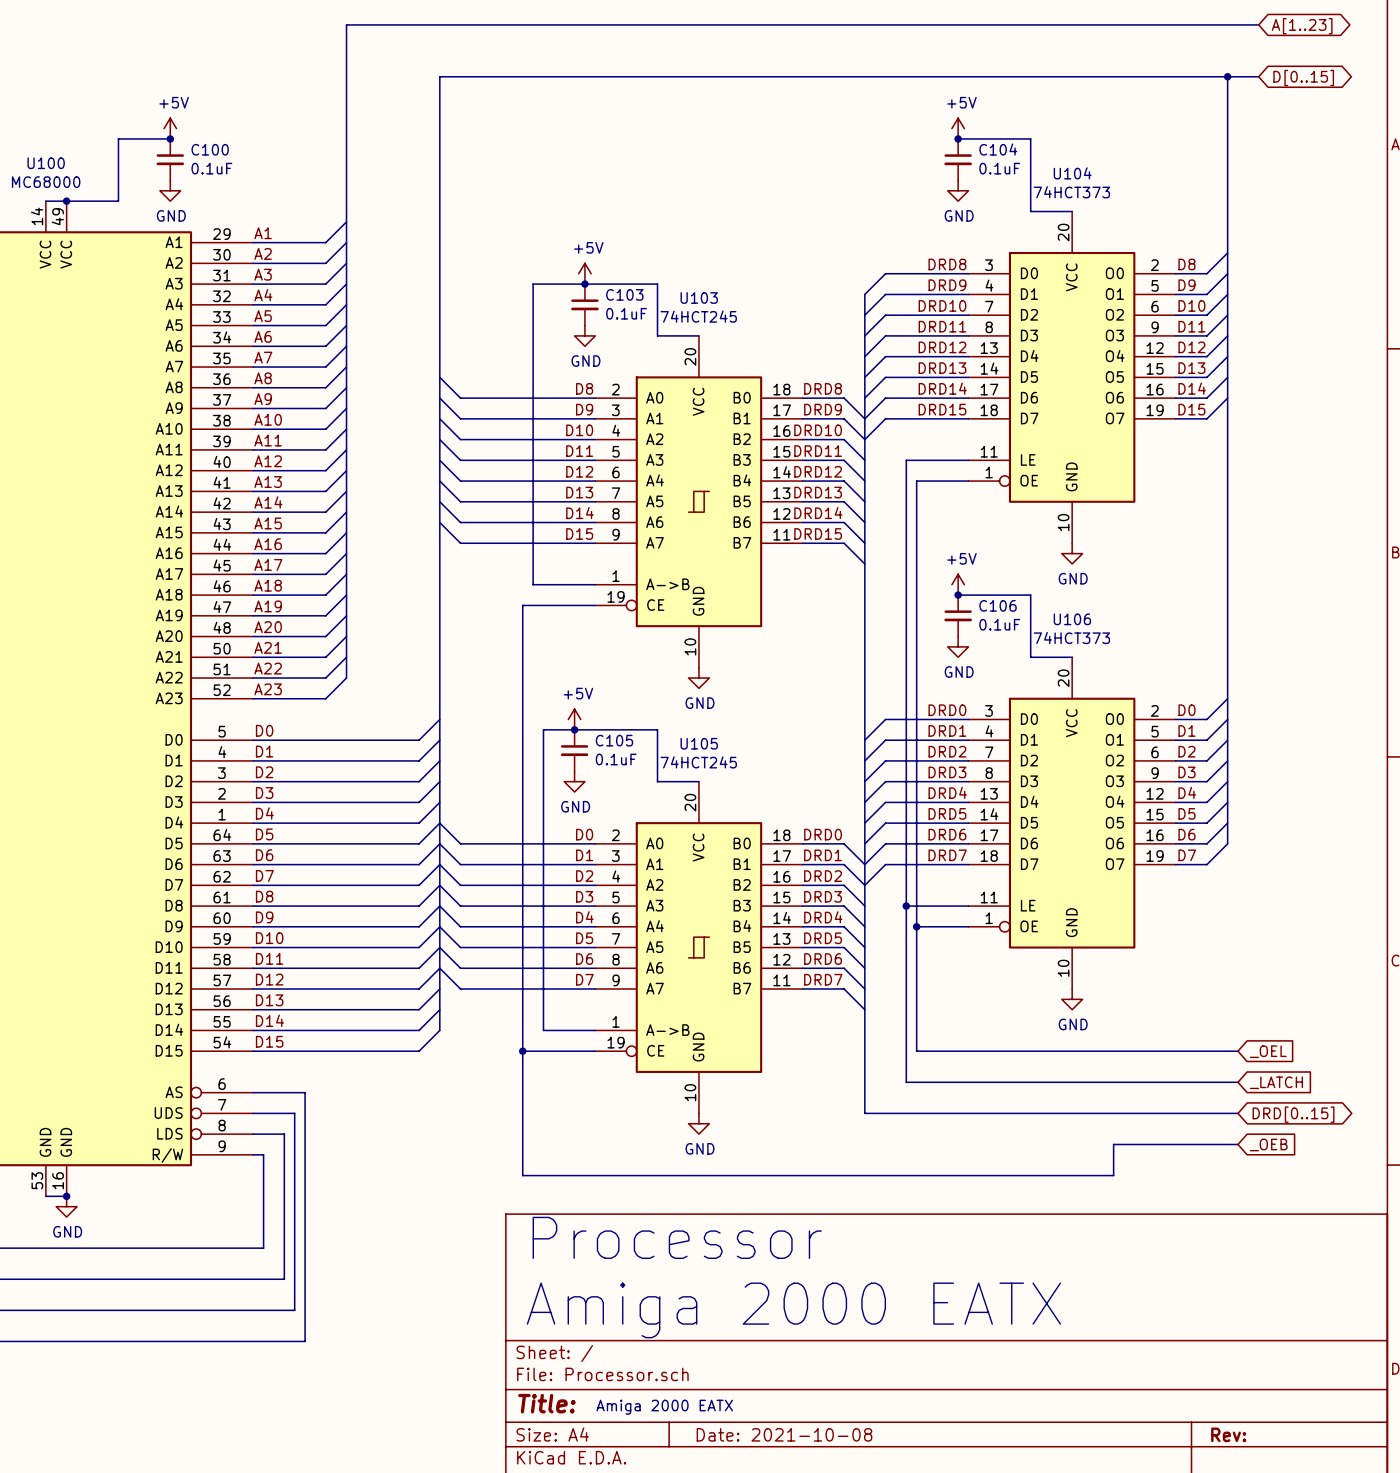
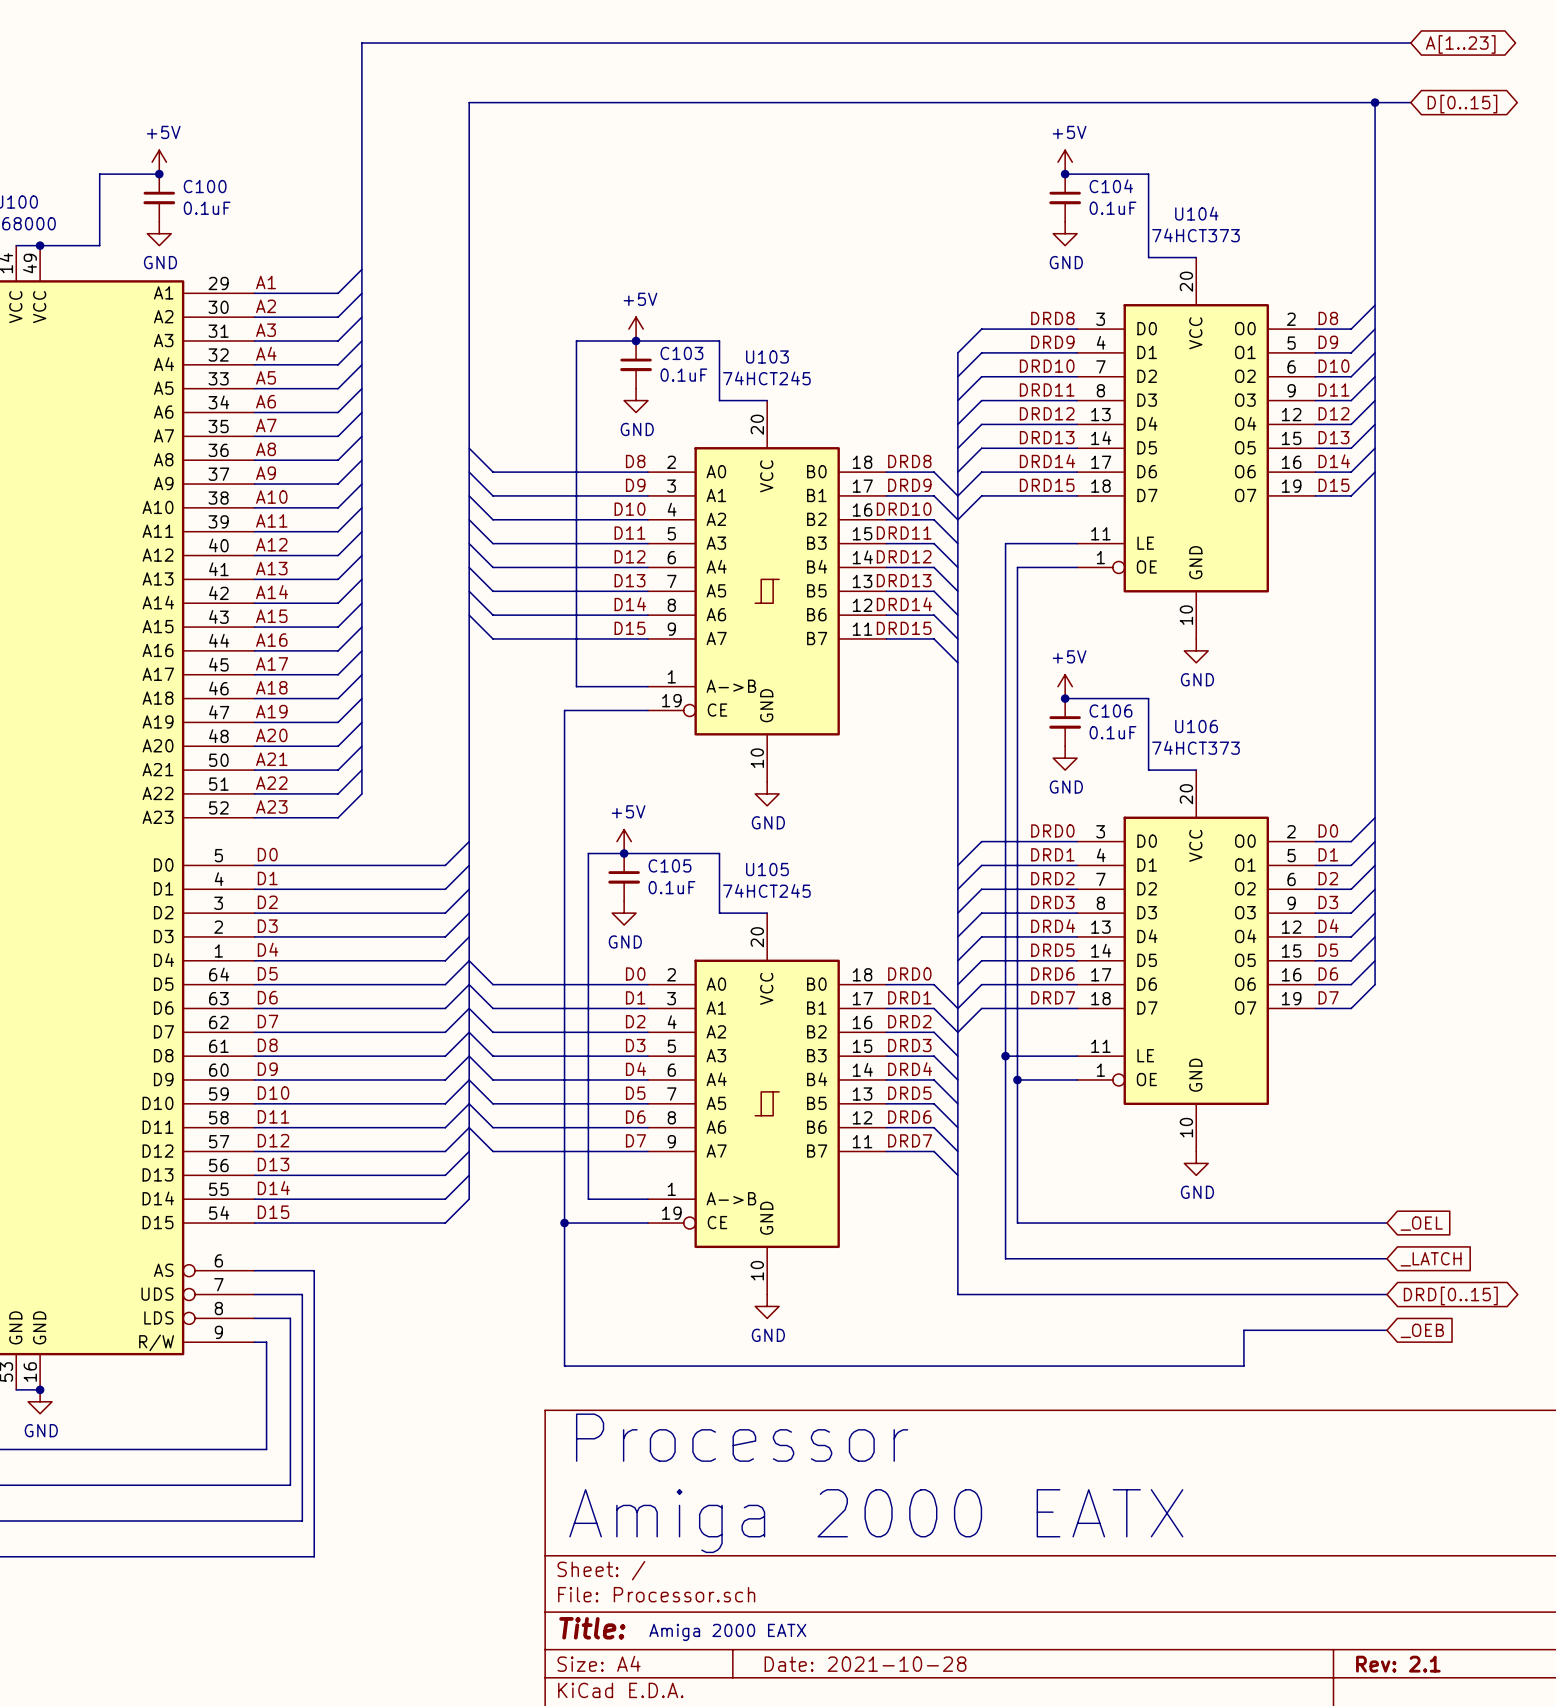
title block: Date: 2021-10-08 (784, 1434) -> Date: 2021-10-28 (865, 1664)
title block: Rev: (1228, 1434) -> Rev: 2.1 (1398, 1664)

